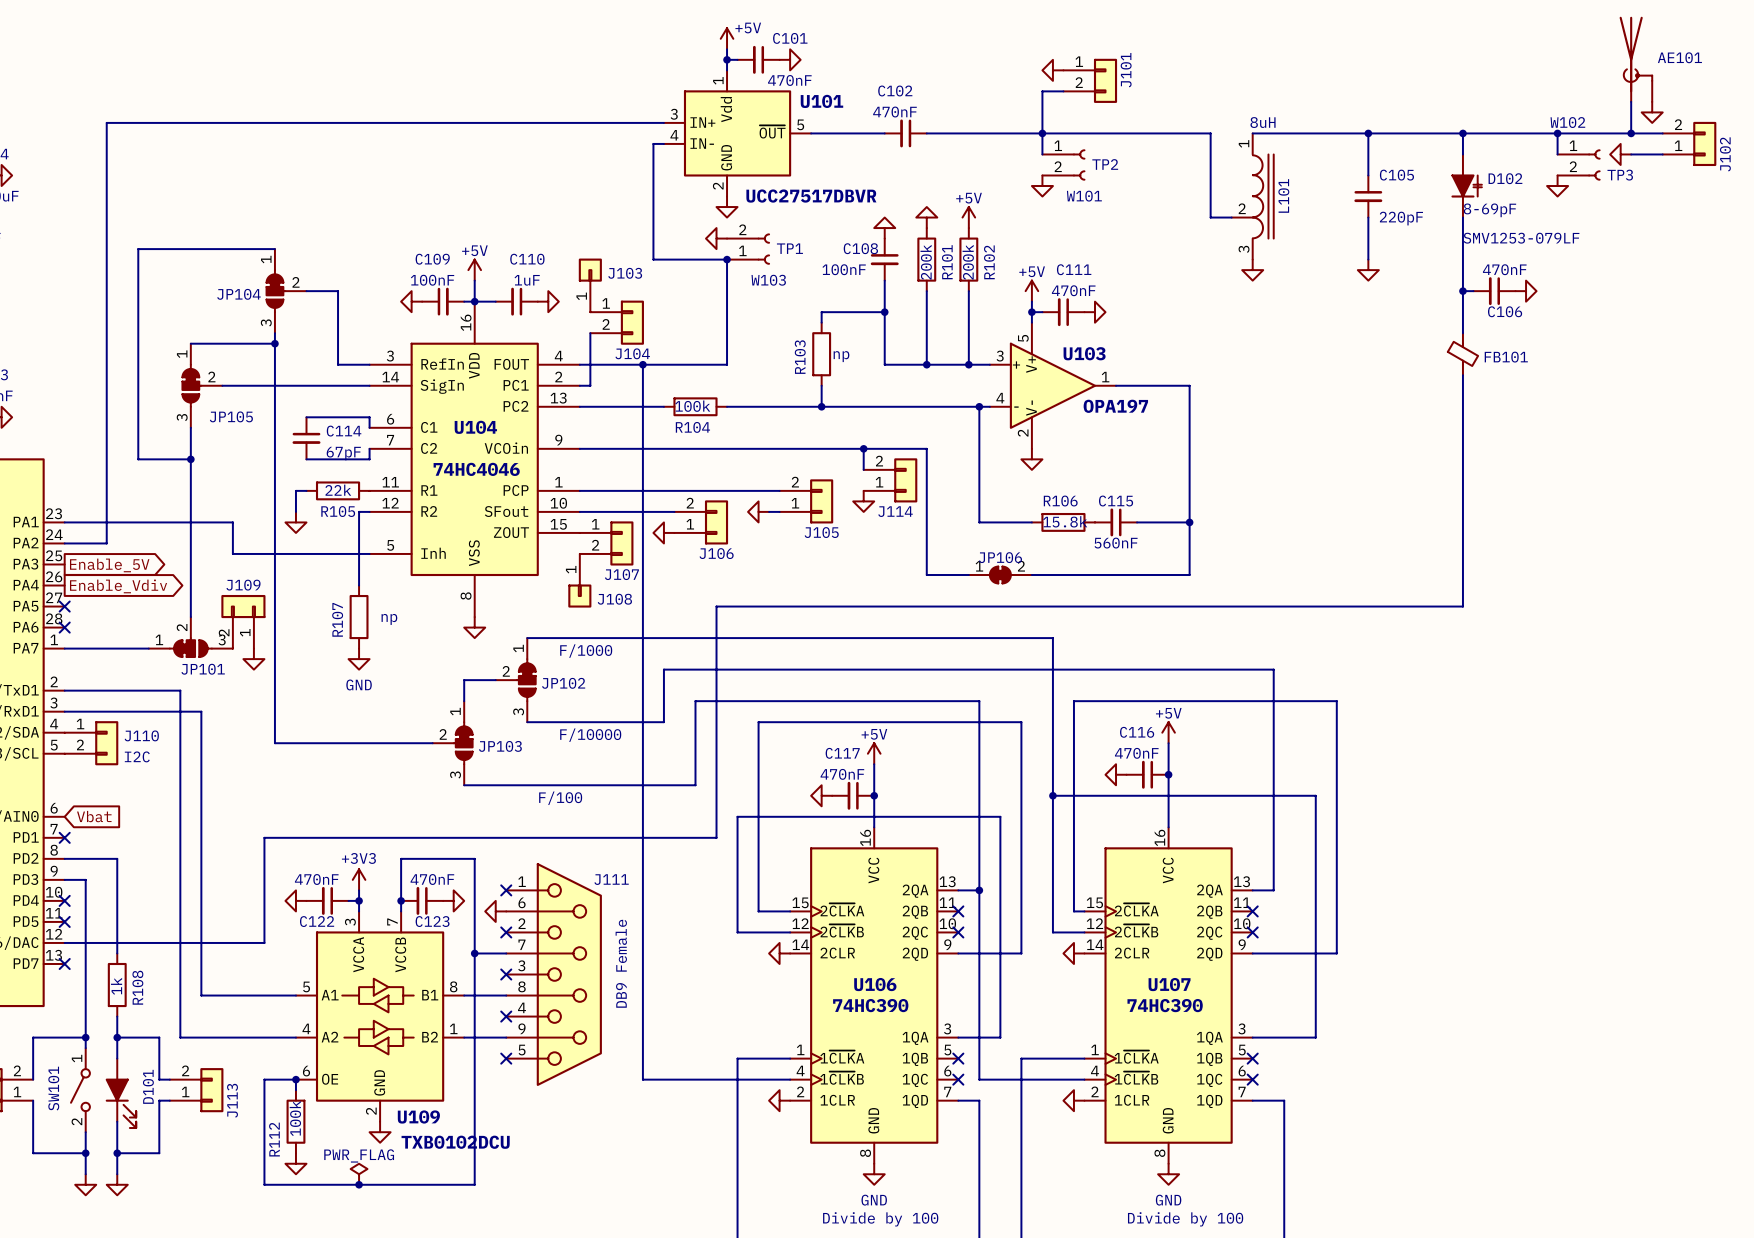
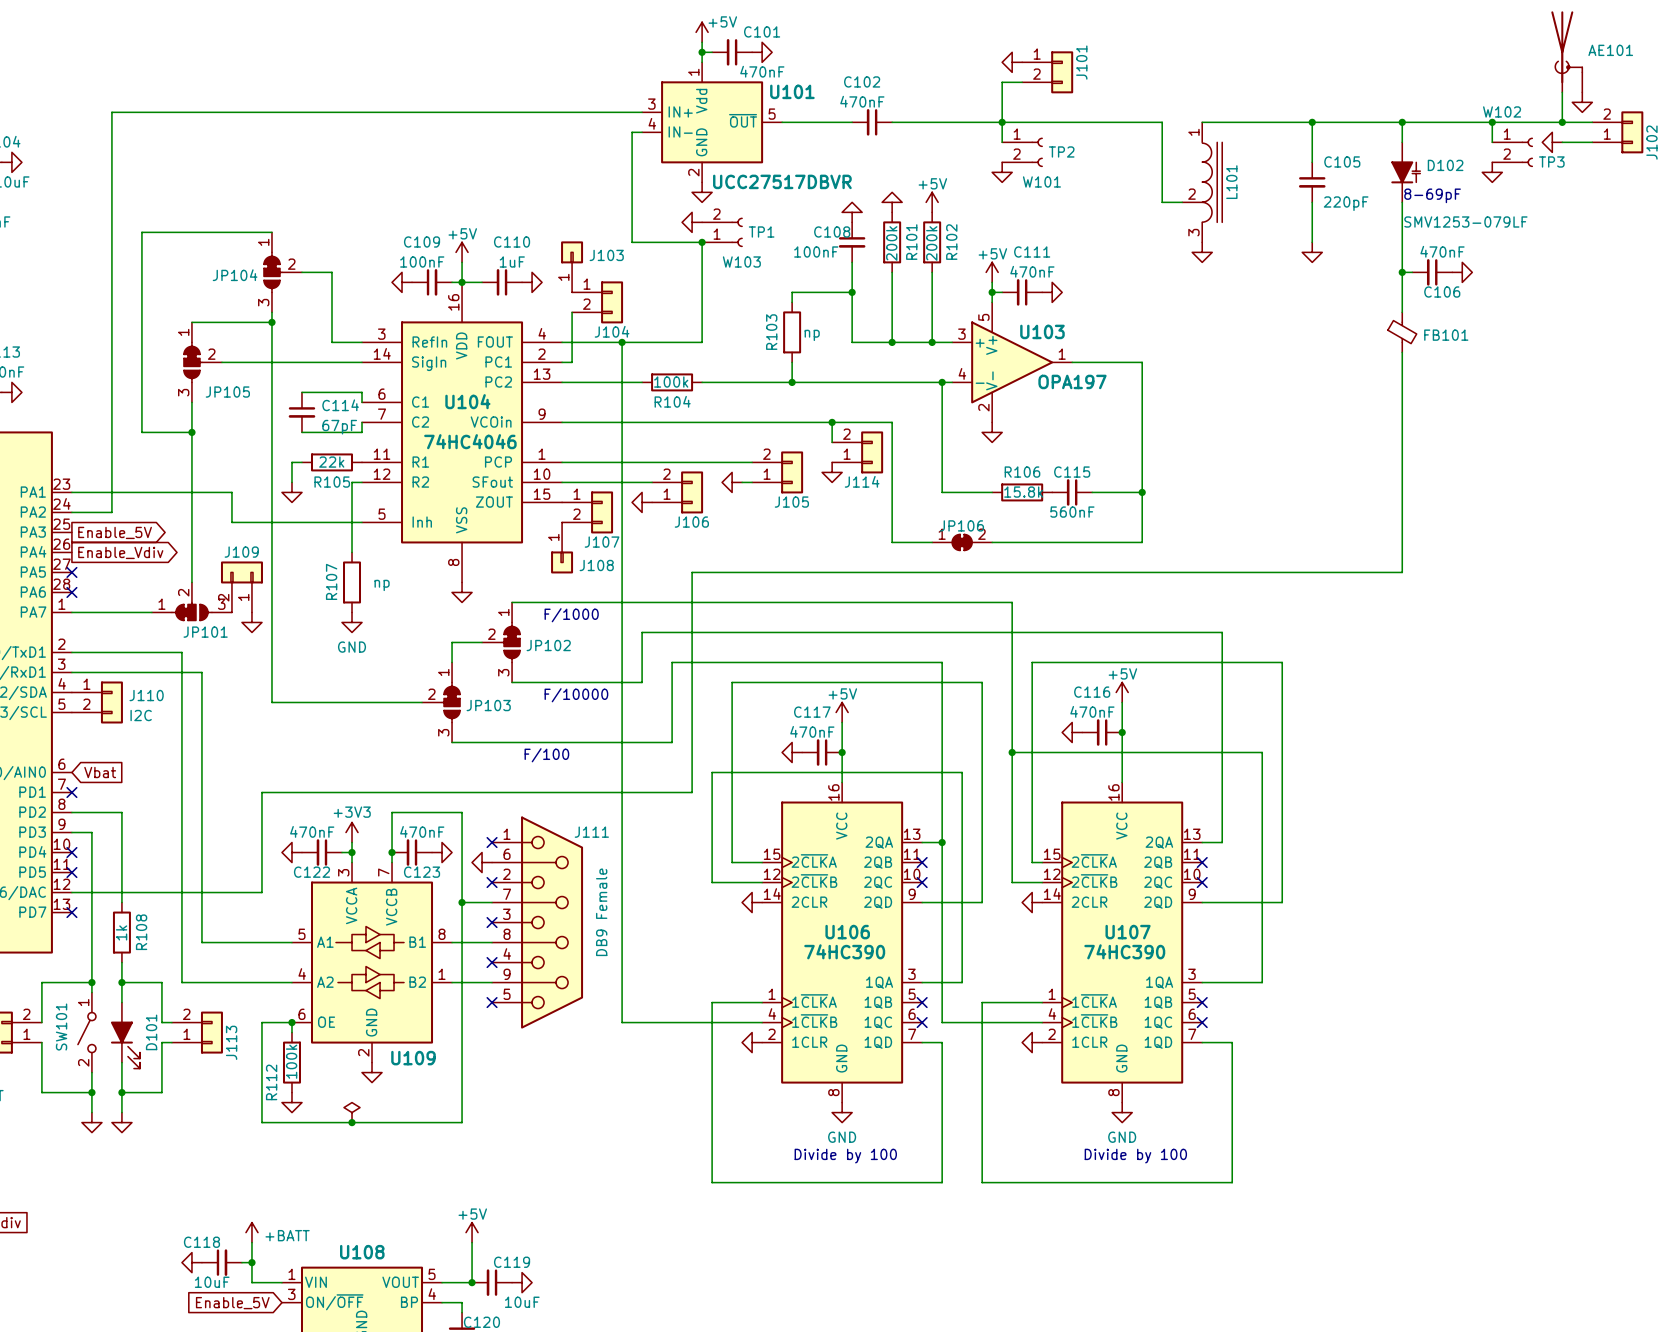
L101 value: 8uH (1263, 122) -> none
U109 value: TXB0102DCU (455, 1142) -> none
power symbol text: PWR_FLAG (359, 1155) -> none

